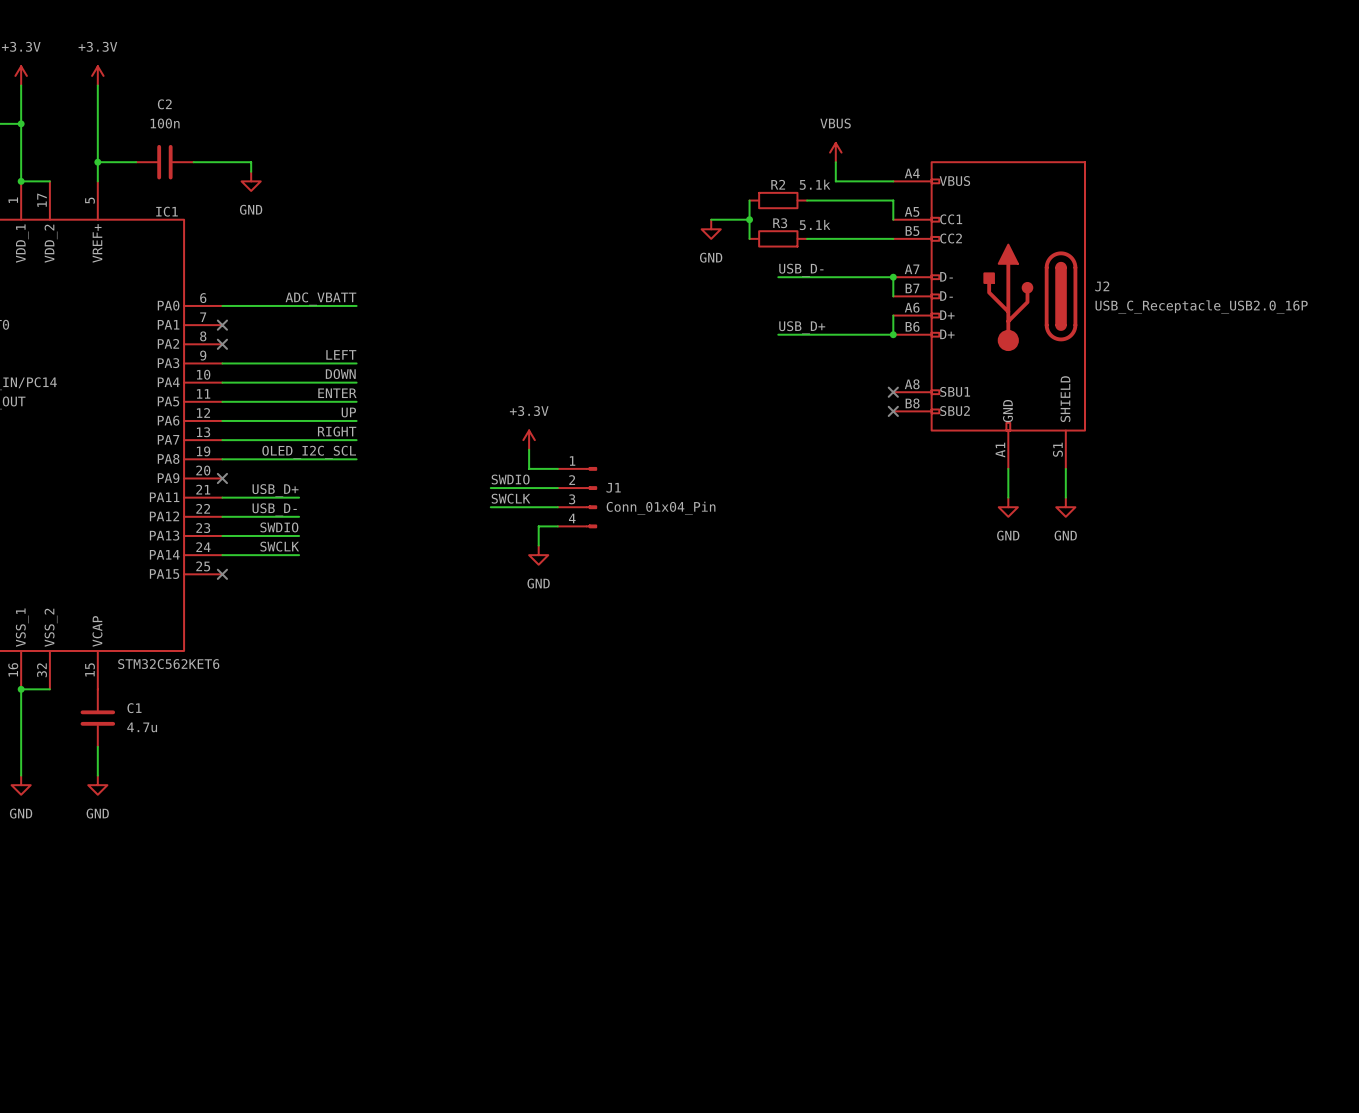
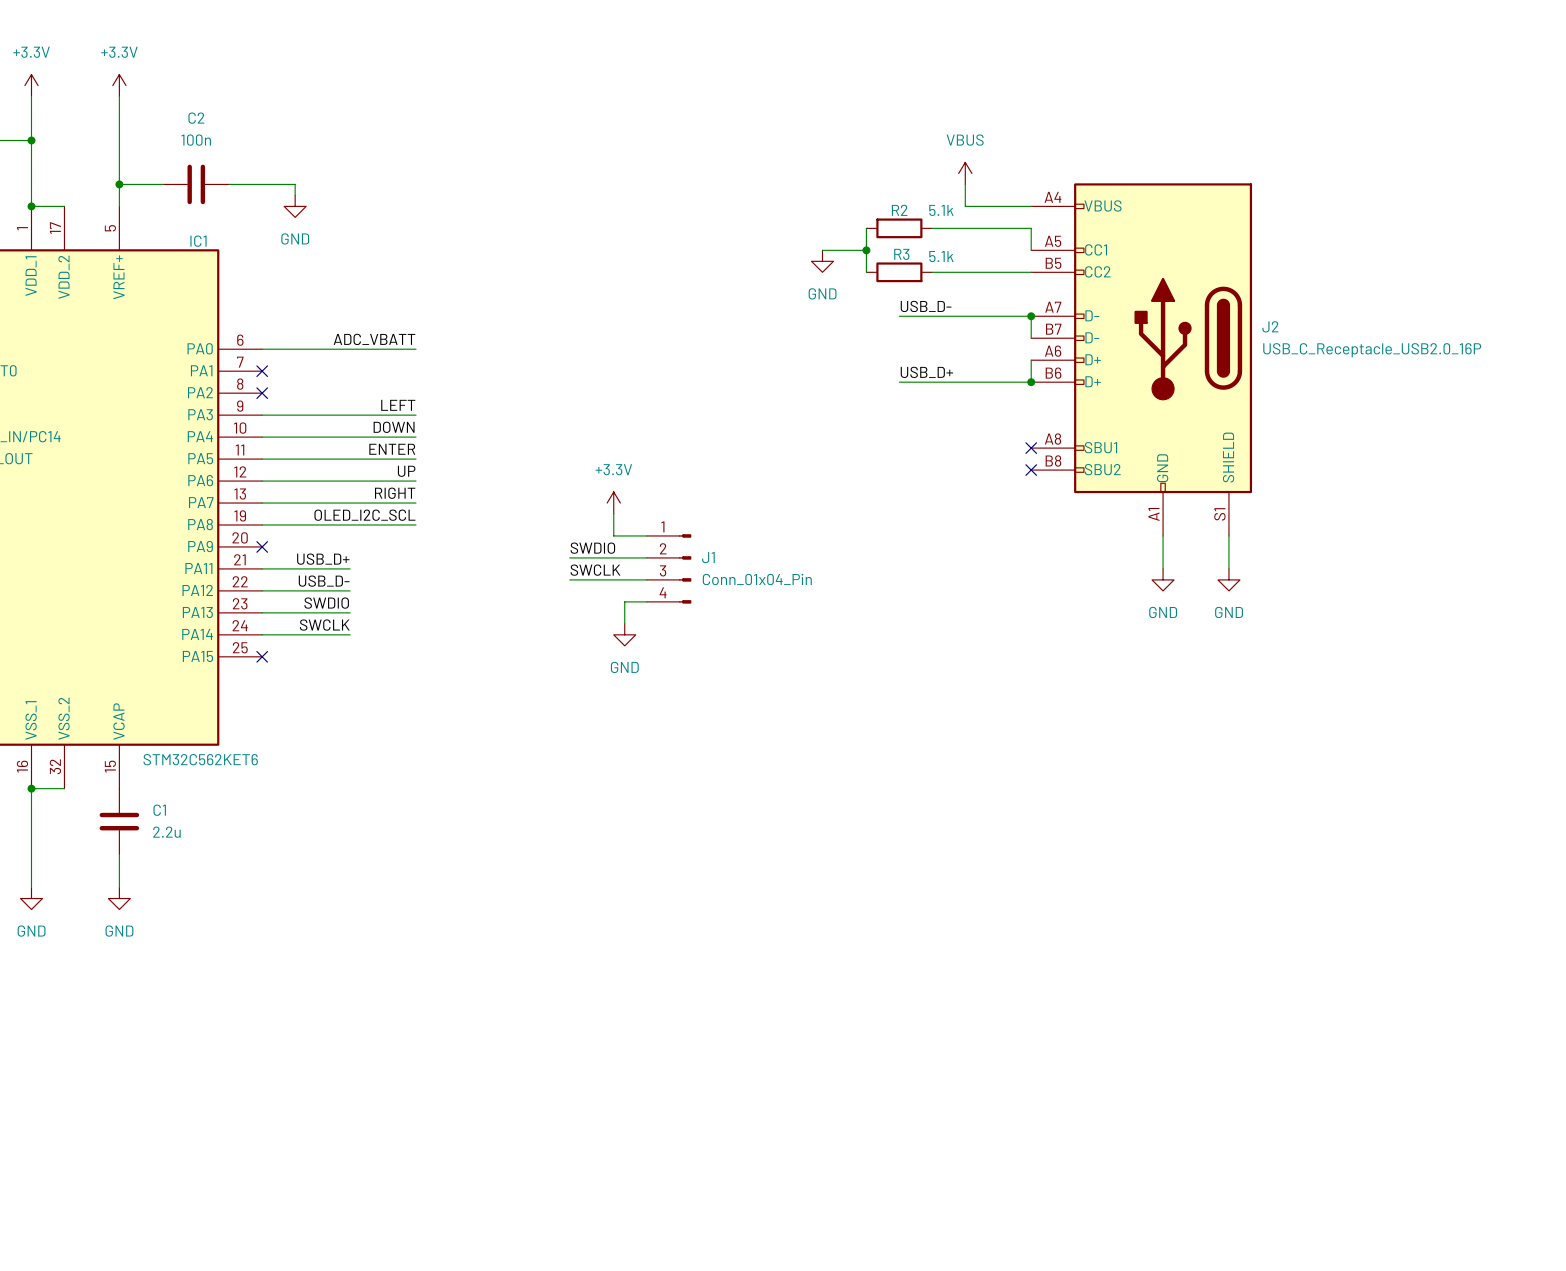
C1 value: 4.7u (142, 727) -> 2.2u (166, 832)

